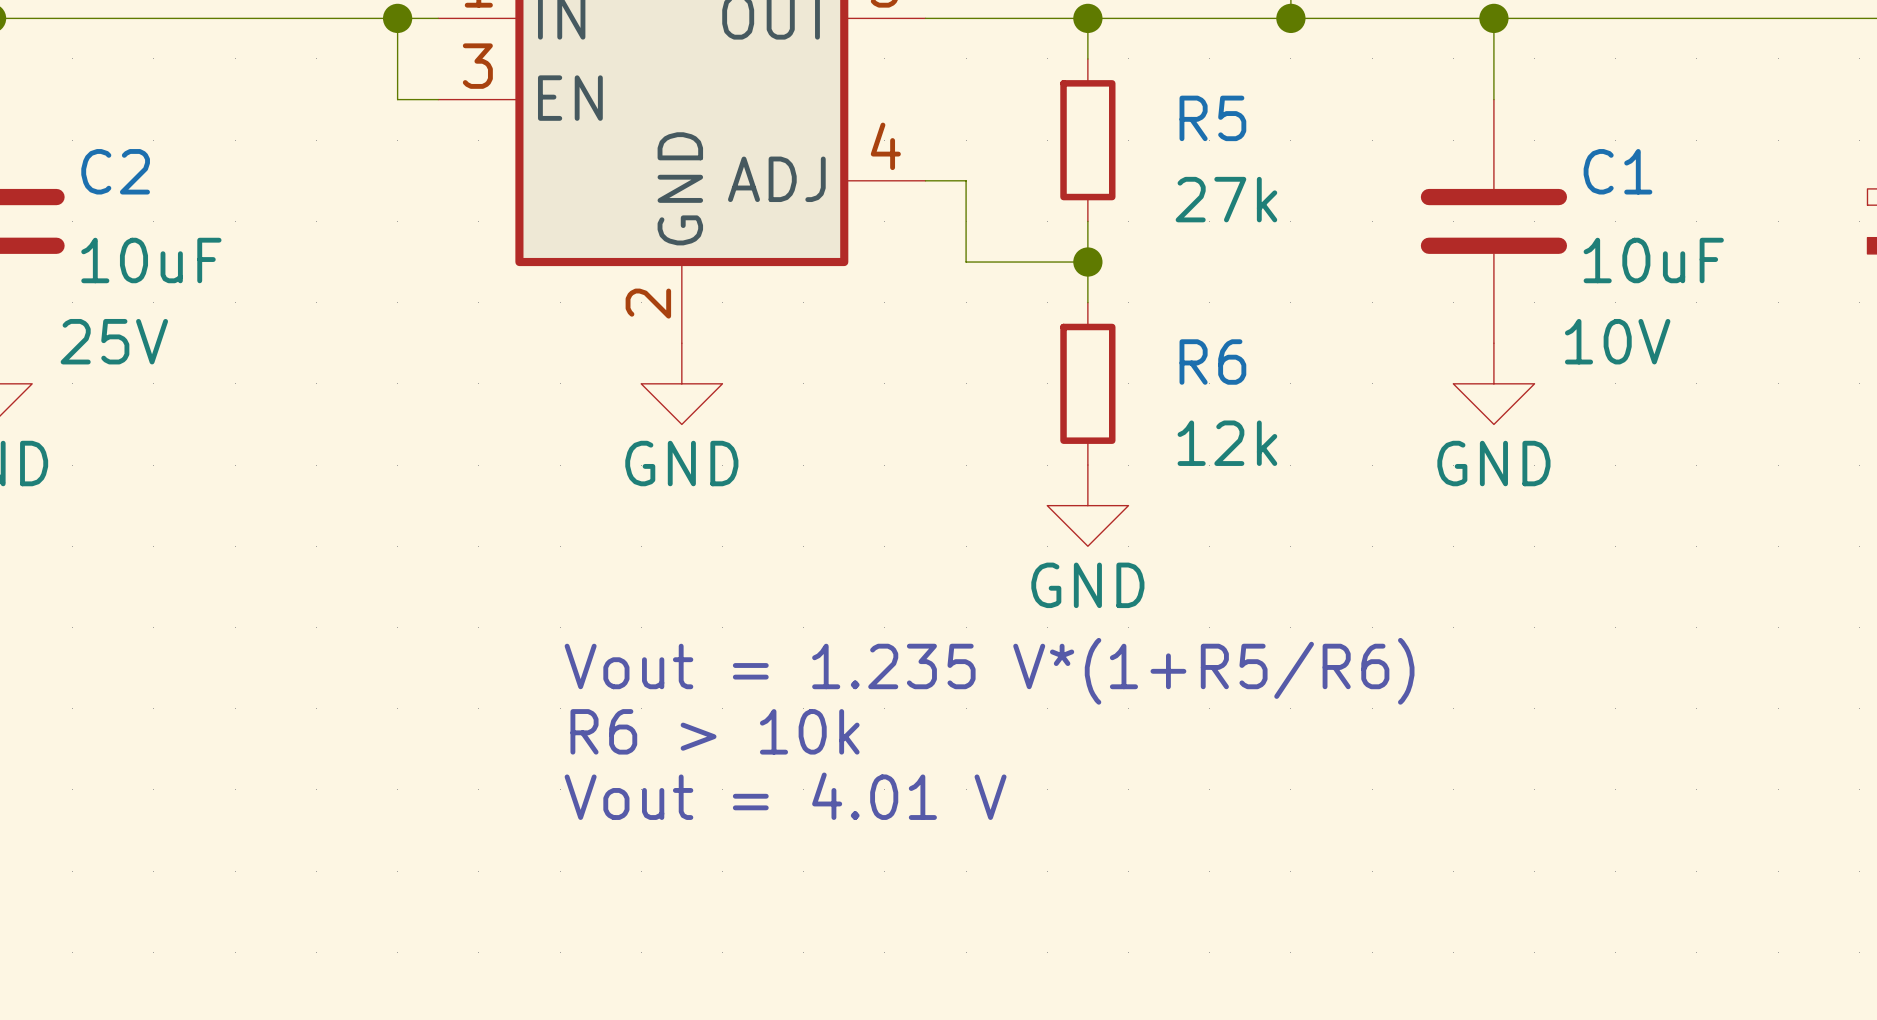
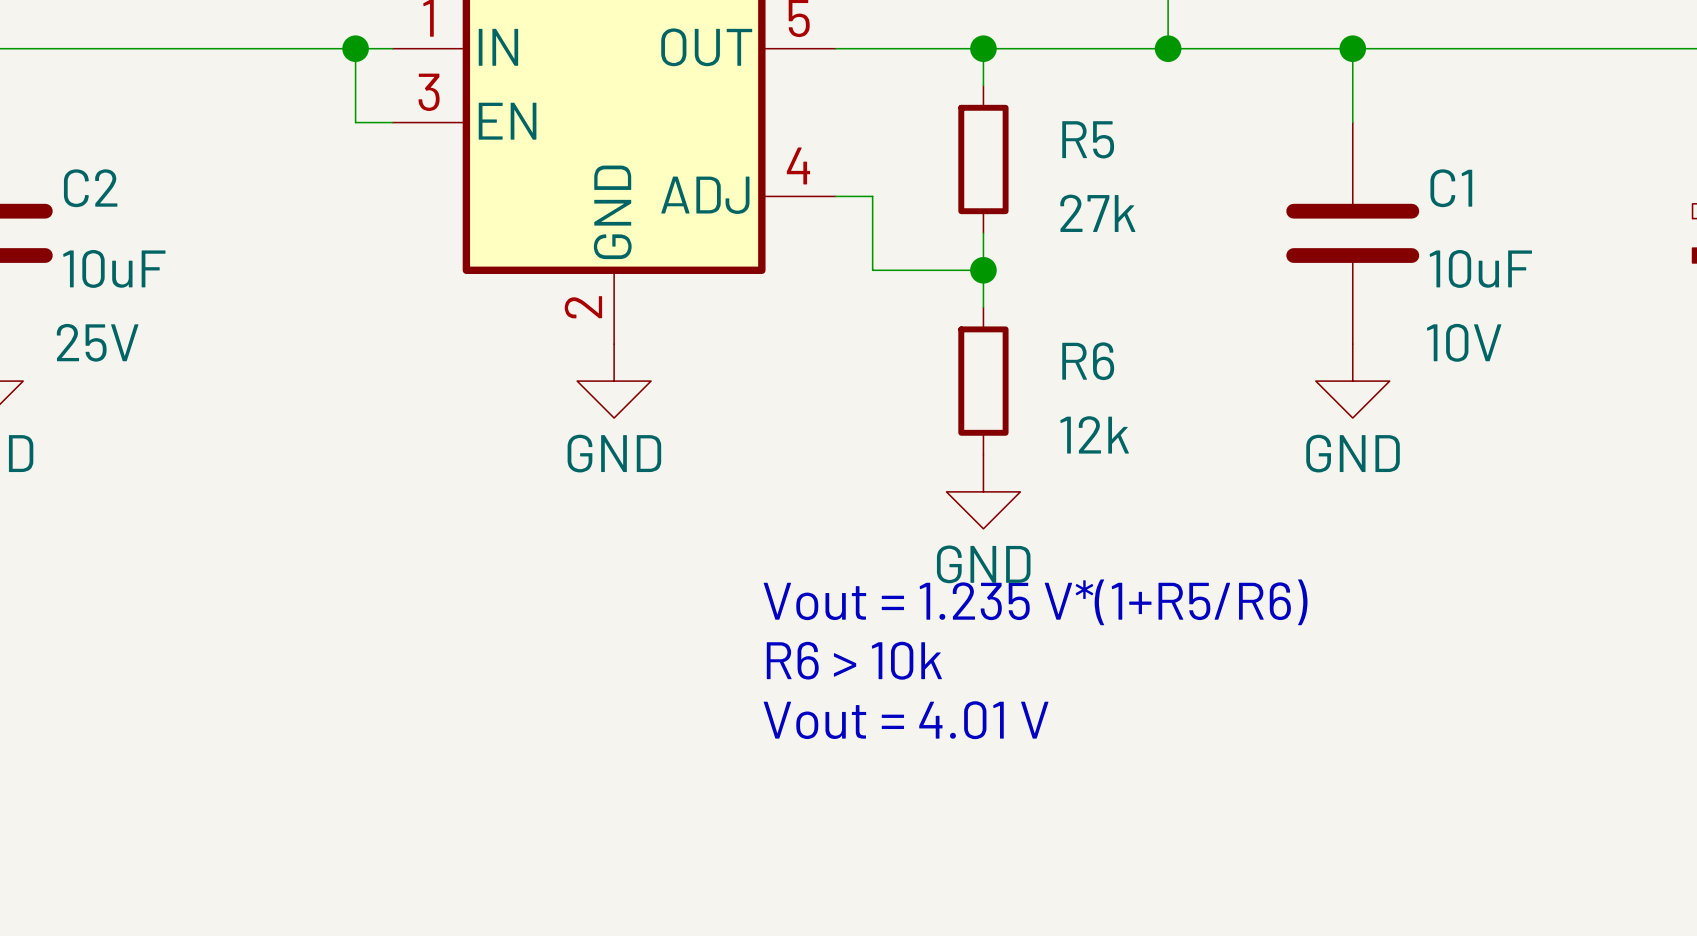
text position: Vout = 1.235 V*(1+R5/R6) (989, 671) -> Vout = 1.235 V*(1+R5/R6) (1035, 602)
text position: R6 > 10k (715, 731) -> R6 > 10k (854, 660)
text position: Vout = 4.01 V (785, 796) -> Vout = 4.01 V (906, 720)

